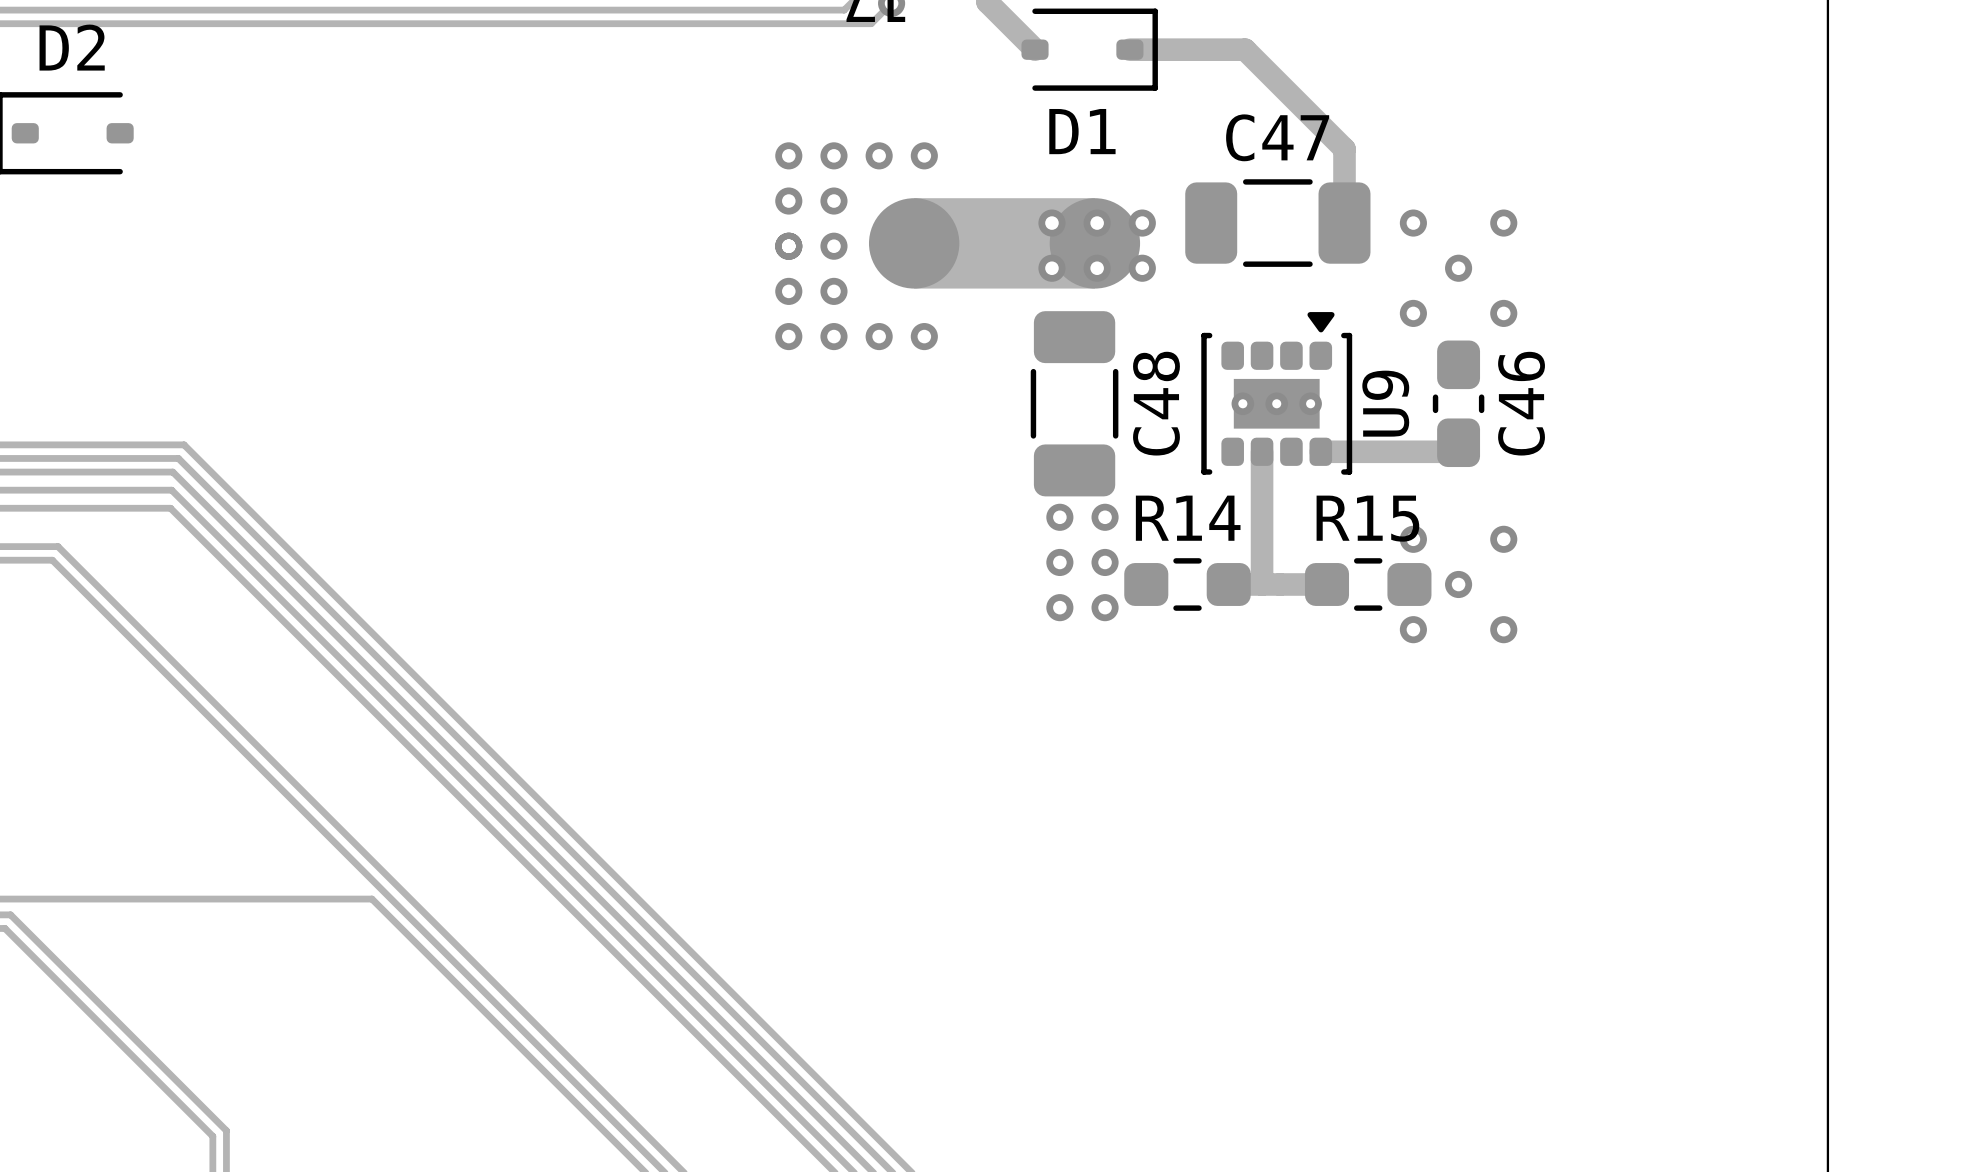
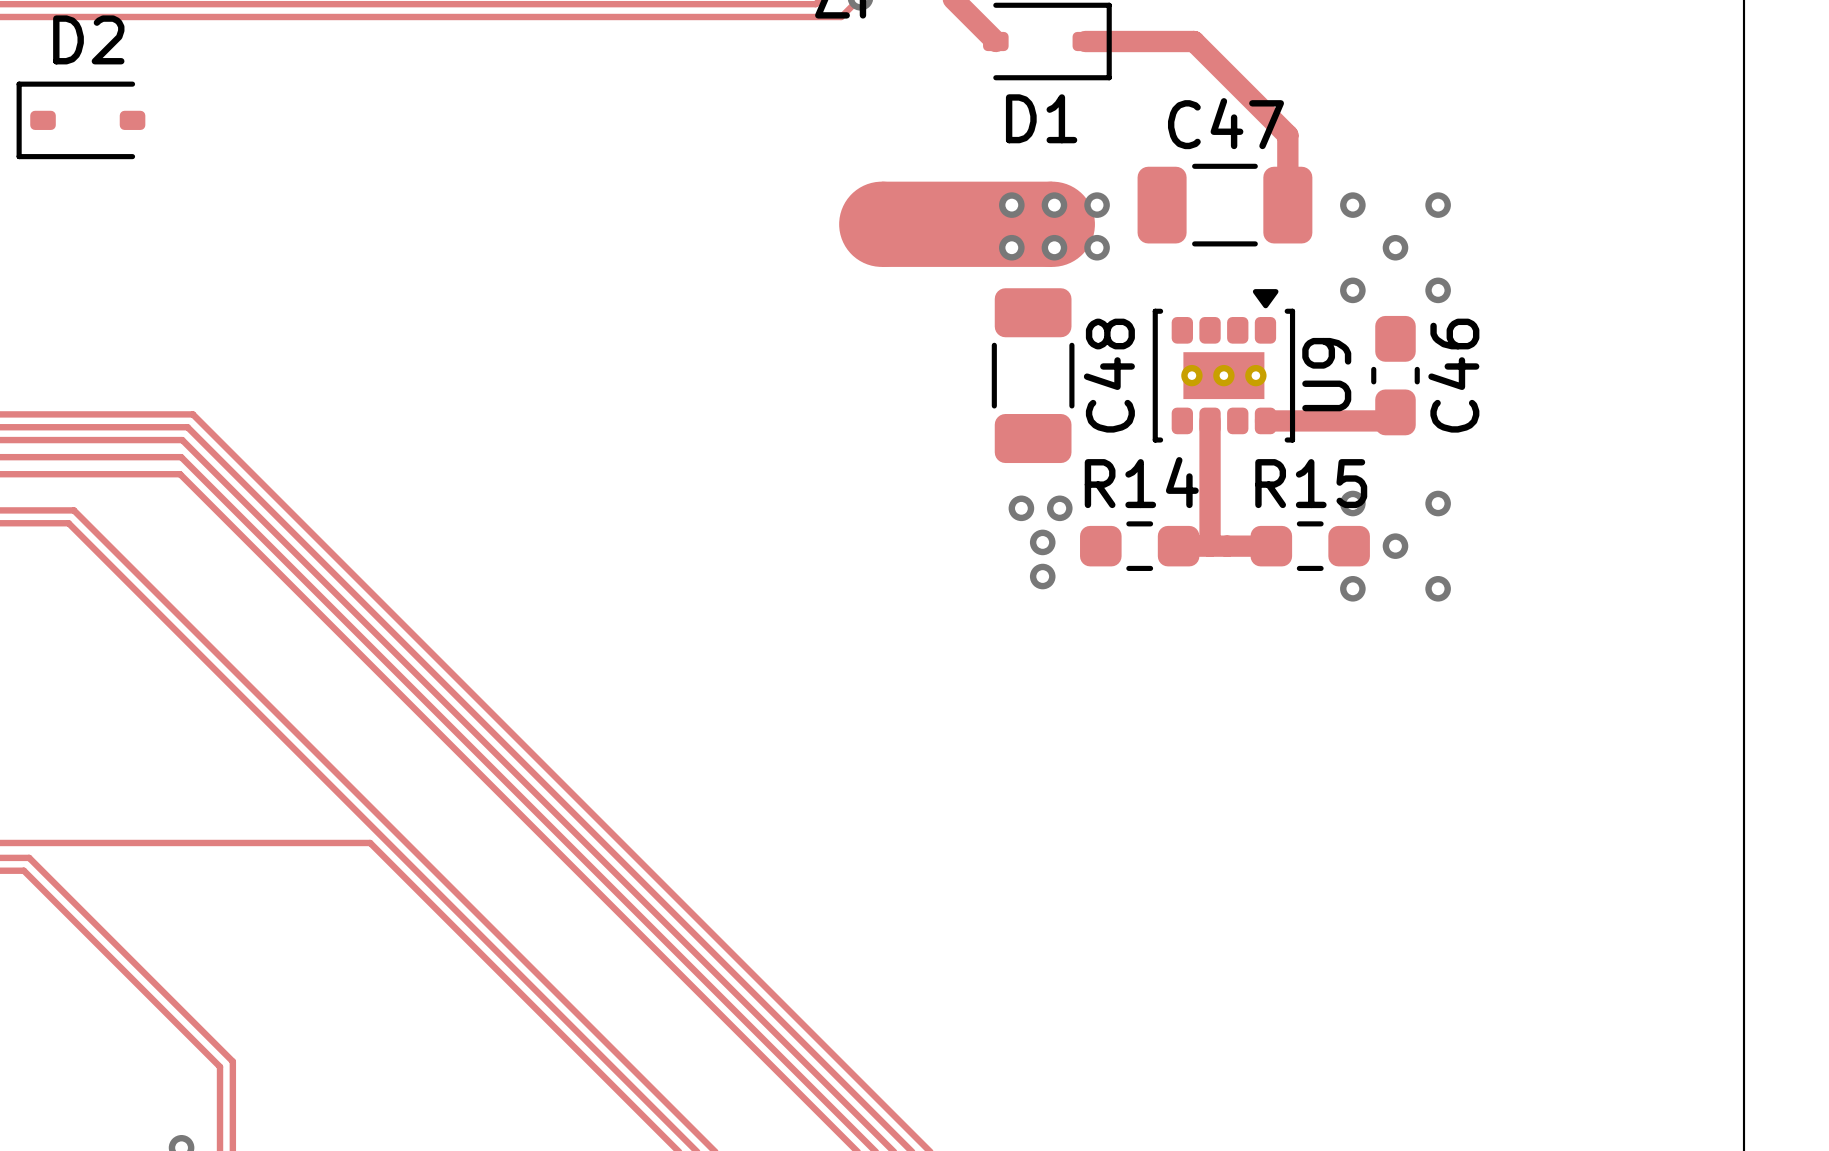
via: (788, 155) -> none
via: (833, 155) -> none
via: (879, 155) -> none
via: (924, 155) -> none
via: (788, 201) -> none
via: (833, 201) -> none
via: (788, 246) -> none
via: (833, 246) -> none
via: (788, 291) -> none
via: (833, 291) -> none
via: (788, 336) -> none
via: (833, 336) -> none
via: (879, 336) -> none
via: (924, 336) -> none
via: (1059, 517) -> none
via: (1105, 517) -> none
via: none -> (1021, 508)
via: none -> (1059, 508)
via: (1059, 562) -> none
via: (1105, 562) -> none
via: none -> (1042, 542)
via: (1059, 607) -> none
via: (1105, 607) -> none
via: none -> (1042, 576)

